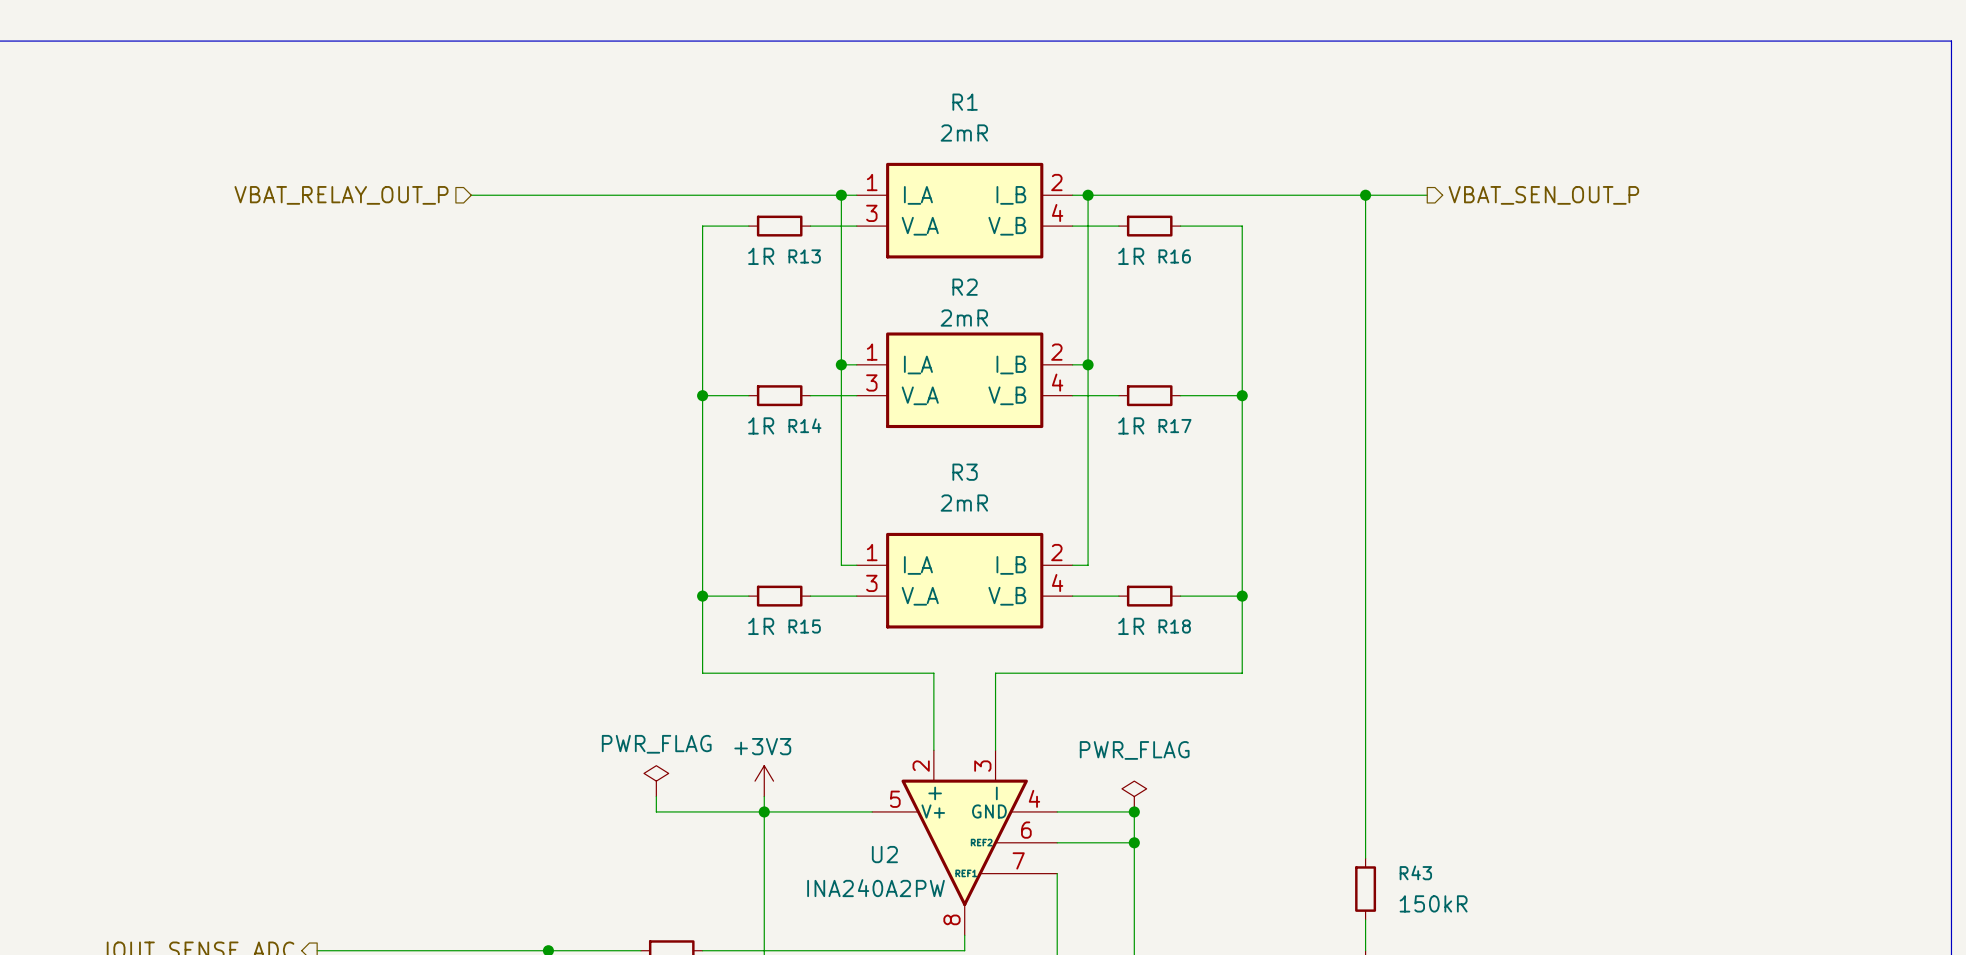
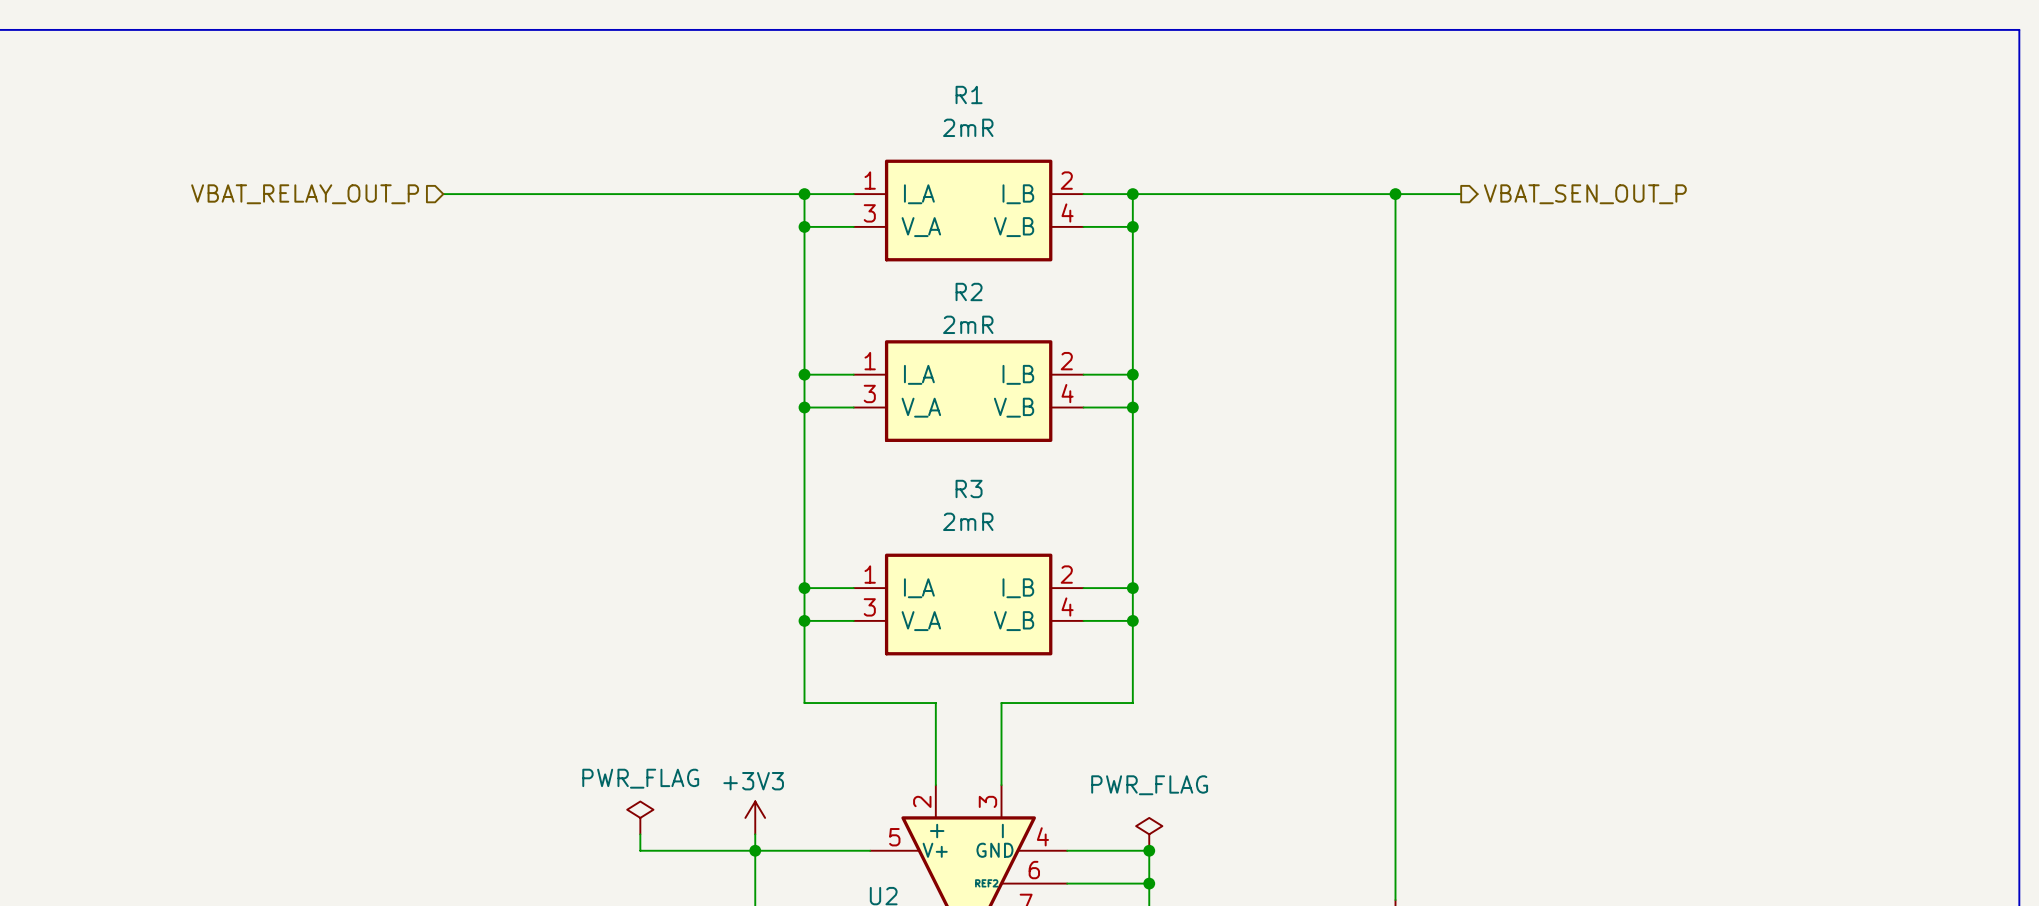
junction: none -> (804, 194)
wire: (841, 195) (841, 565) -> (804, 588) (837, 588)
junction: (841, 195) -> none
wire: (1088, 195) (1088, 565) -> (1132, 588) (1100, 588)
junction: (1088, 195) -> none
junction: none -> (1132, 194)
wire: (748, 226) (702, 226) (702, 673) (810, 673) -> (804, 194) (804, 703)
R13: 1R (779, 226) -> none
junction: none -> (804, 226)
junction: none -> (1132, 226)
R16: 1R (1149, 226) -> none
wire: (1180, 226) (1242, 226) (1242, 673) (1118, 673) -> (1132, 194) (1132, 703)
wire: none -> (804, 374) (837, 374)
junction: none -> (804, 374)
junction: (841, 364) -> none
wire: none -> (1100, 374) (1132, 374)
junction: (1088, 364) -> none
junction: none -> (1132, 374)
wire: (702, 395) (748, 395) -> none
junction: (702, 395) -> none
R14: 1R (779, 395) -> none
junction: none -> (804, 407)
junction: none -> (1132, 407)
R17: 1R (1149, 395) -> none
wire: (1180, 395) (1242, 395) -> none
junction: (1242, 395) -> none
junction: none -> (804, 588)
junction: none -> (1132, 588)
wire: (702, 596) (748, 596) -> none
junction: (702, 596) -> none
R15: 1R (779, 596) -> none
junction: none -> (804, 620)
junction: none -> (1132, 620)
R18: 1R (1149, 596) -> none
wire: (1180, 596) (1242, 596) -> none
junction: (1242, 596) -> none

